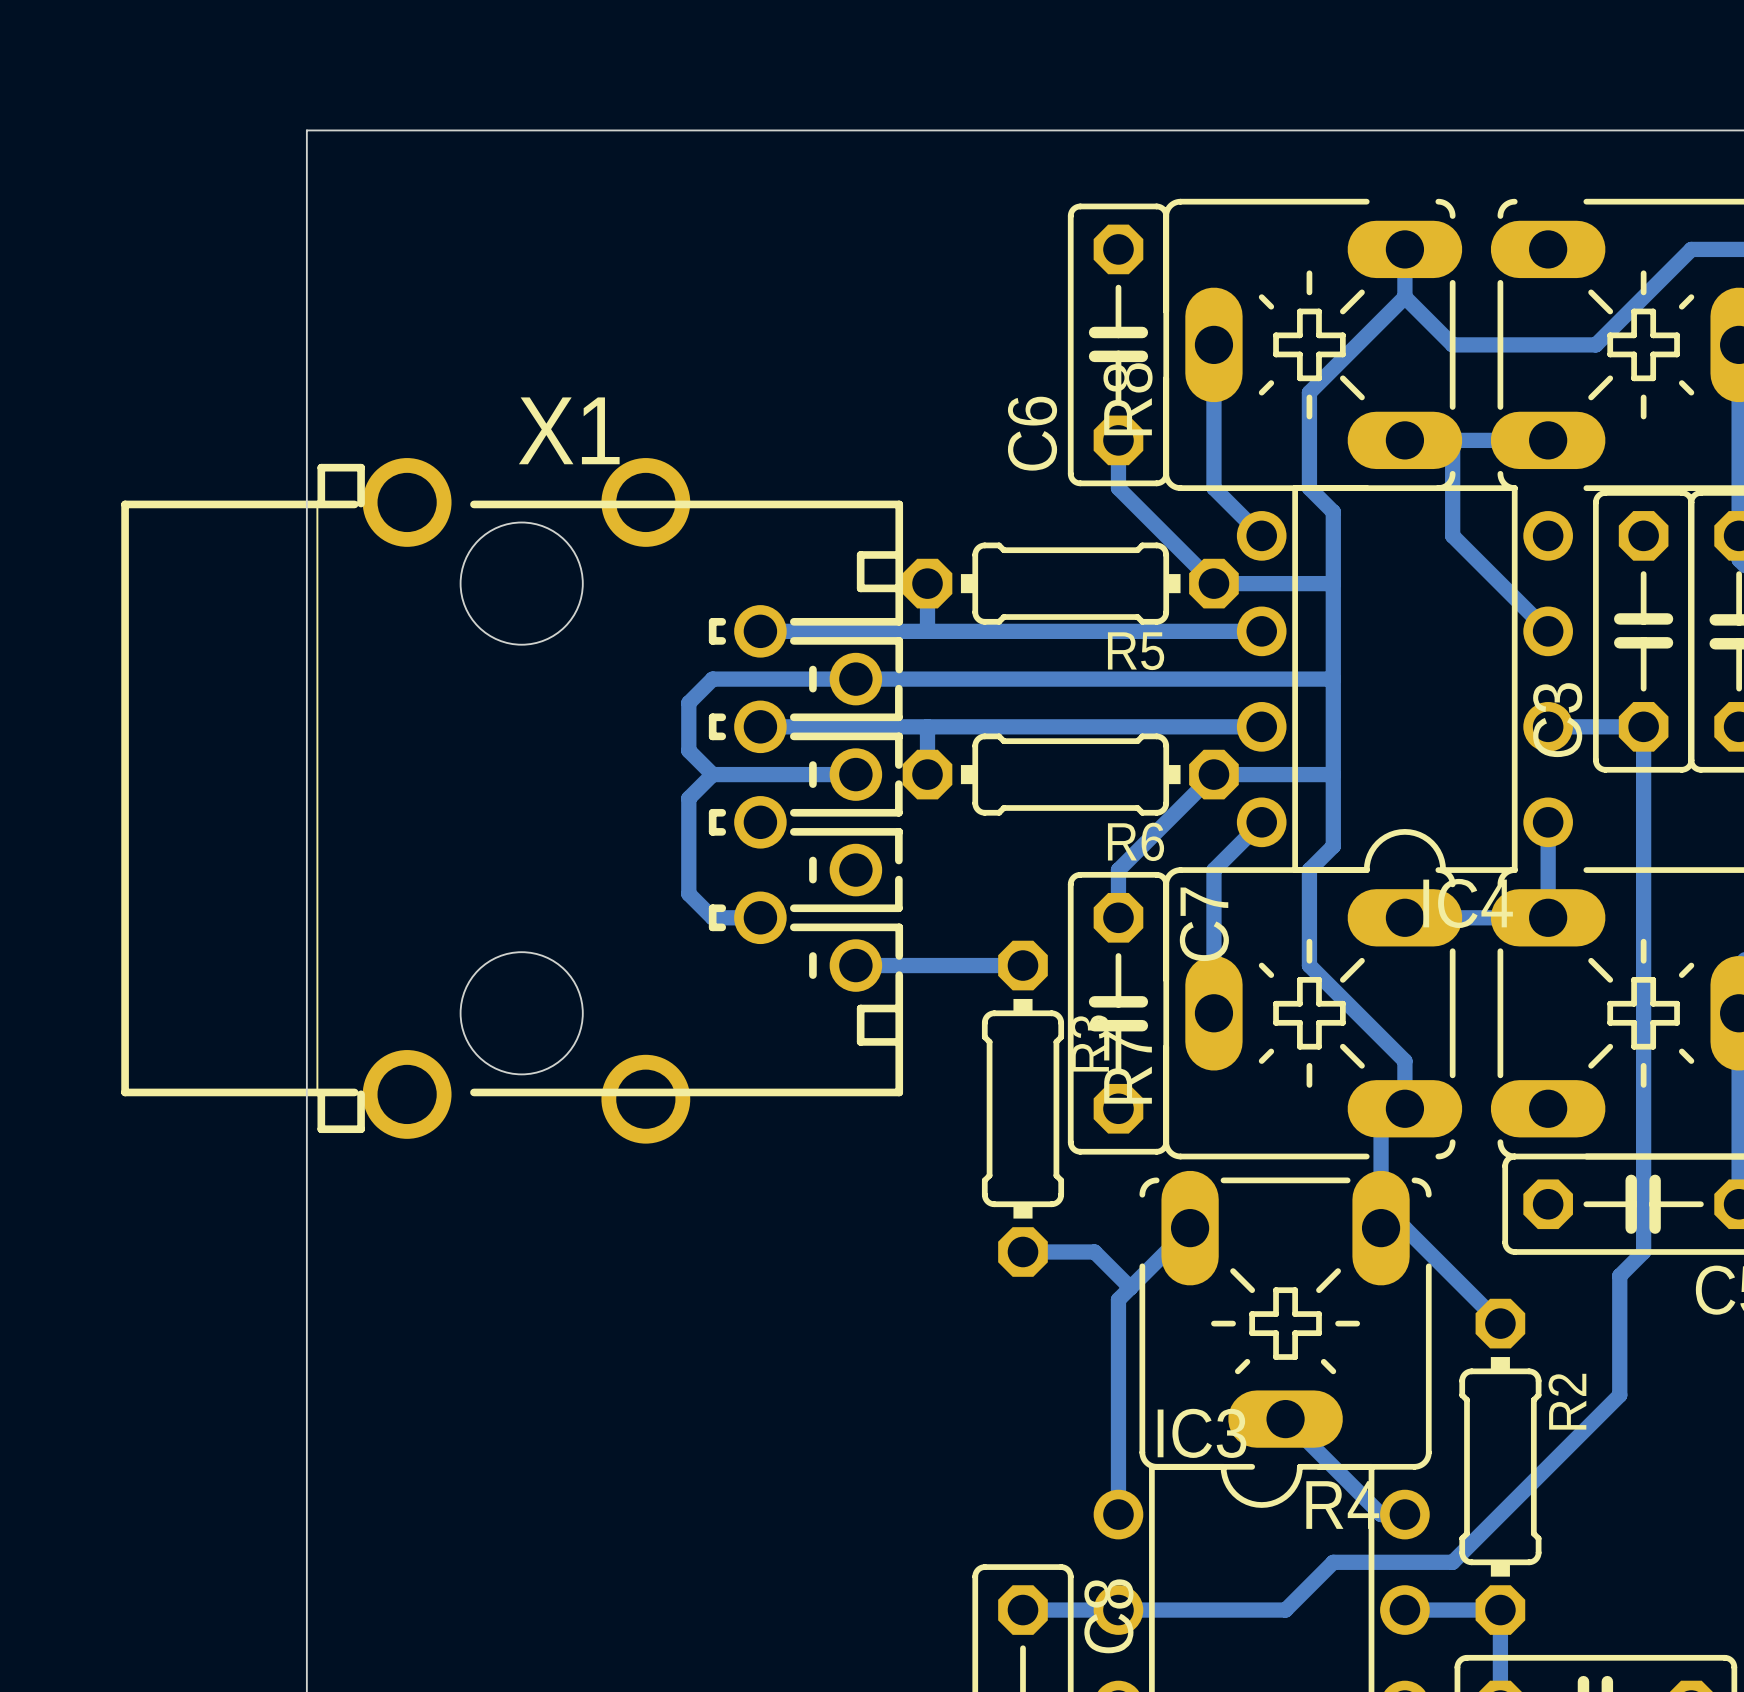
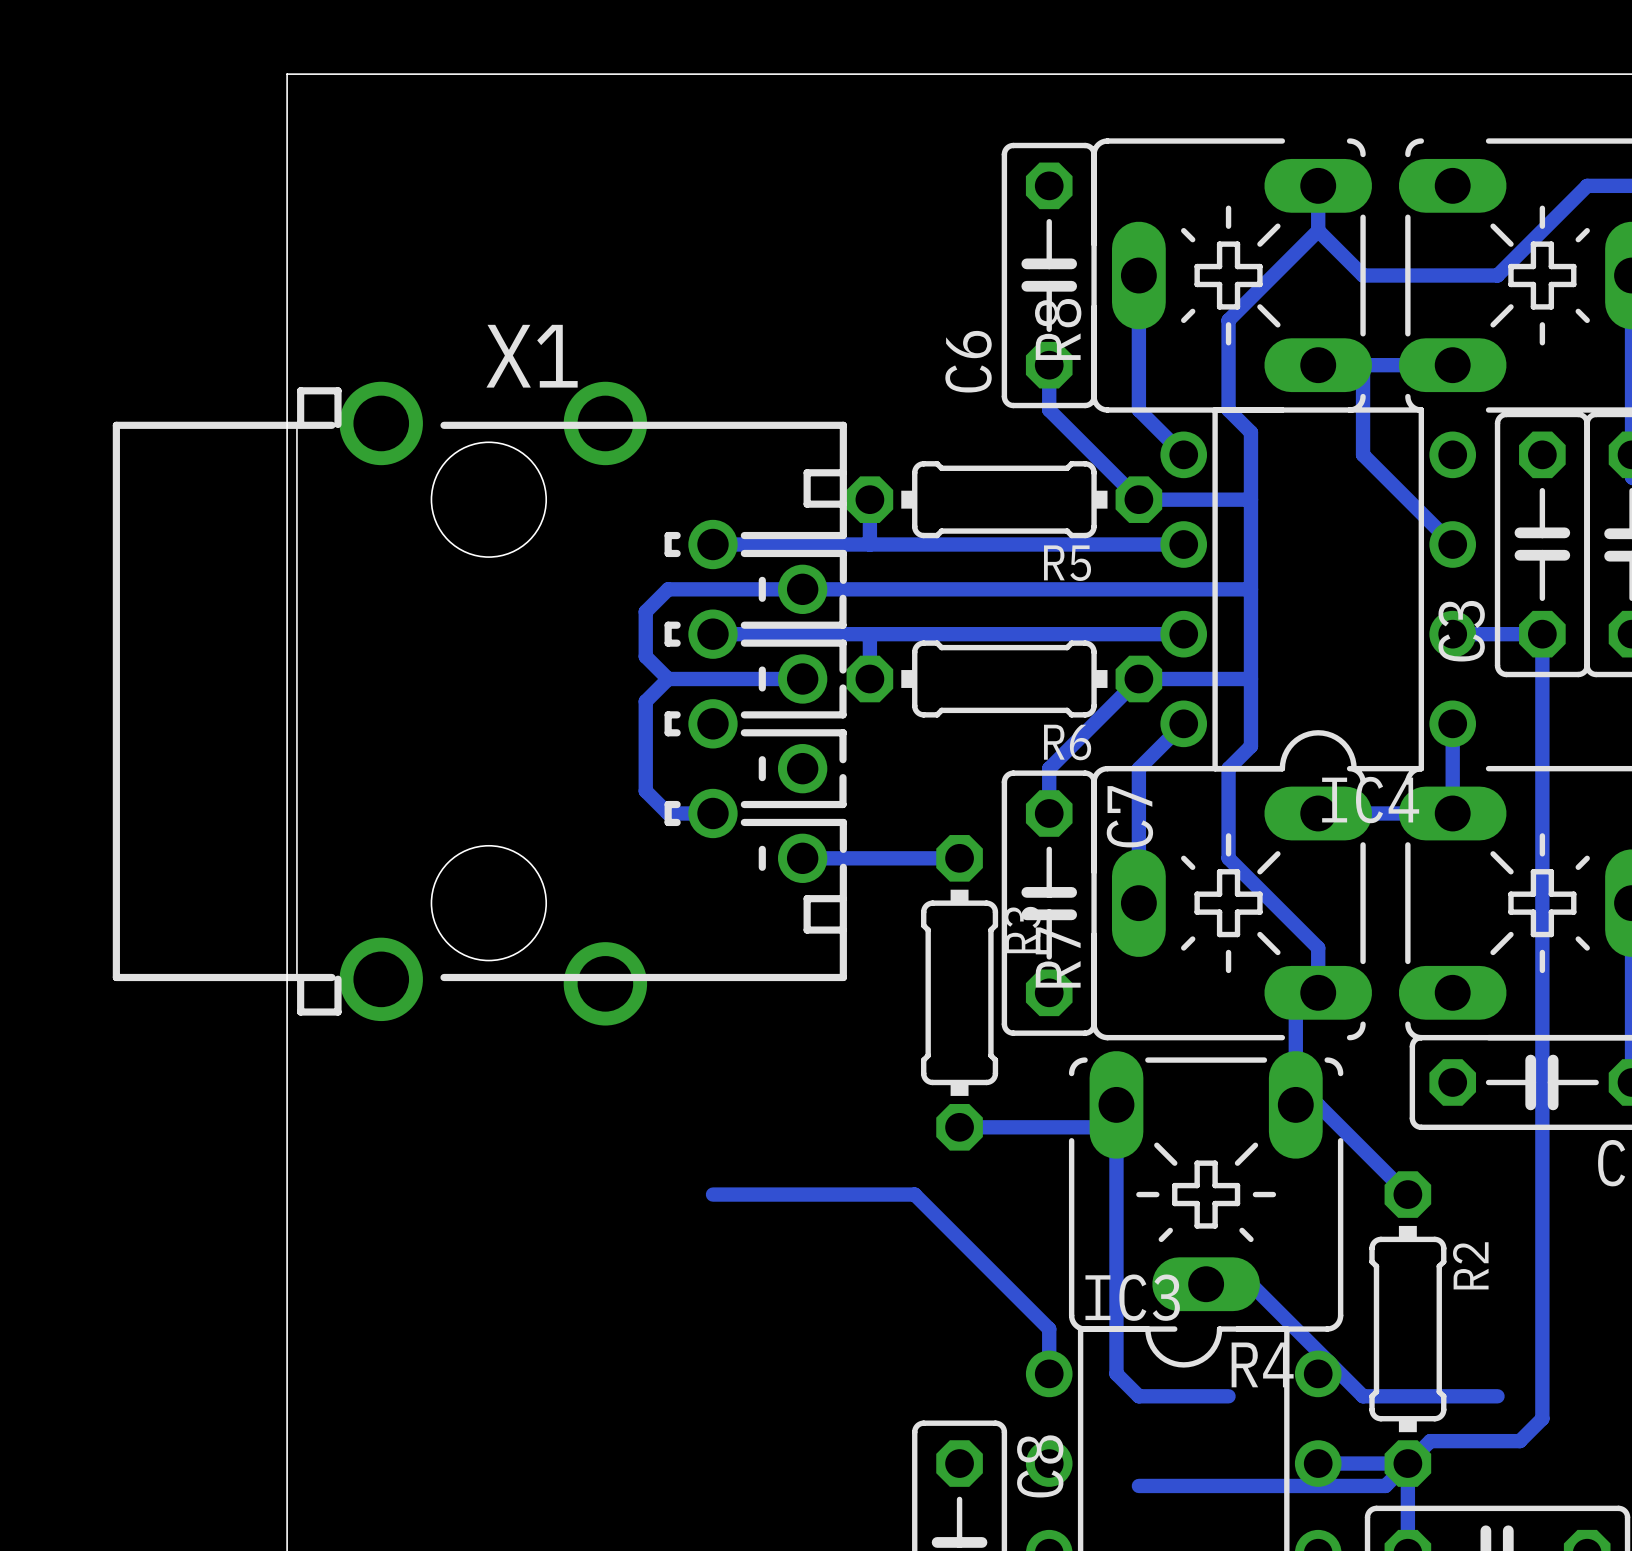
bottom track: (1190, 1228) (1118, 1299) (1118, 1466) -> (1116, 1104) (1116, 1373) (1138, 1396) (1228, 1396)
bottom track: (1094, 1251) (1130, 1287) -> (1026, 1127) (1116, 1127)
bottom track: (1643, 1251) (1619, 1275) (1619, 1395) (1452, 1562) (1333, 1562) (1285, 1610) (1022, 1610) -> (1542, 1127) (1542, 1418) (1519, 1441) (1430, 1441) (1385, 1485) (1138, 1485)
bottom track: none -> (712, 1194) (914, 1194) (1049, 1329)
bottom track: (1285, 1419) (1381, 1514) (1404, 1514) -> (1206, 1284) (1250, 1284) (1363, 1396) (1497, 1396)

